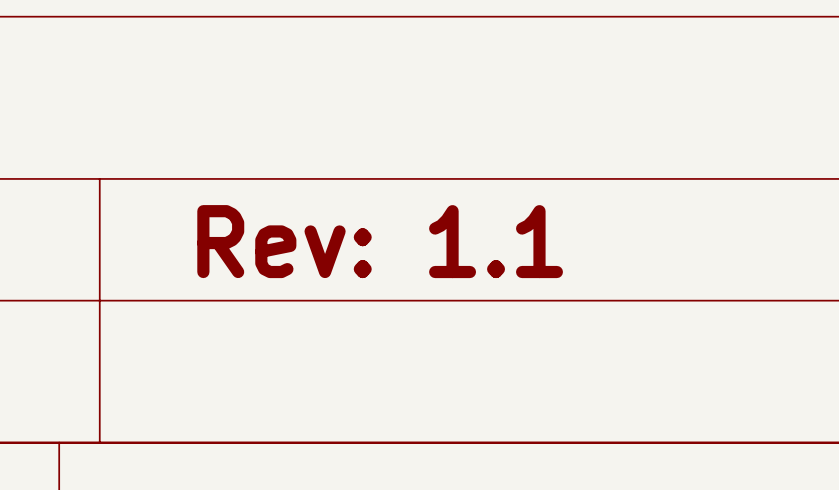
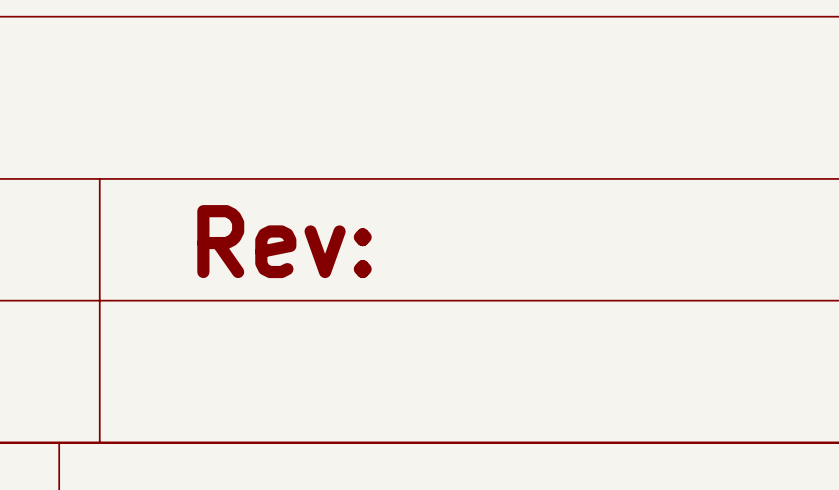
title block: Rev: 1.1 (380, 241) -> Rev: (284, 241)

